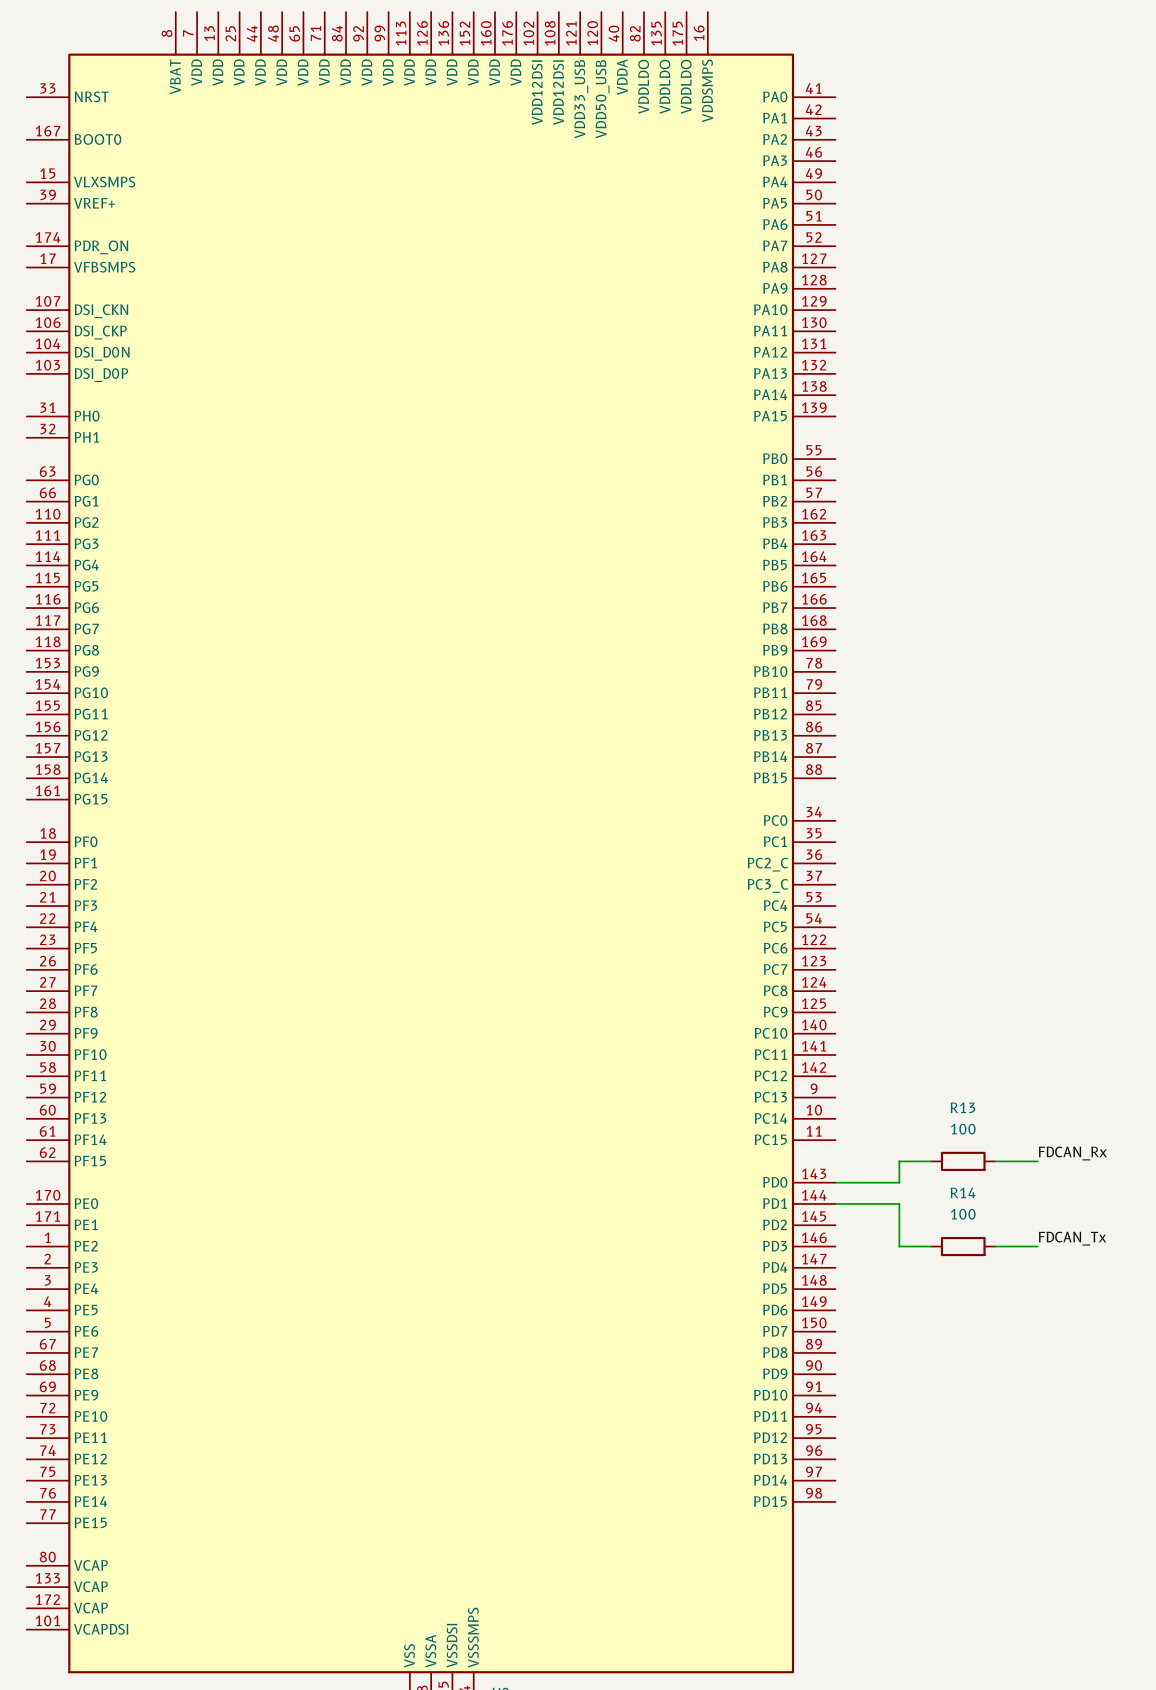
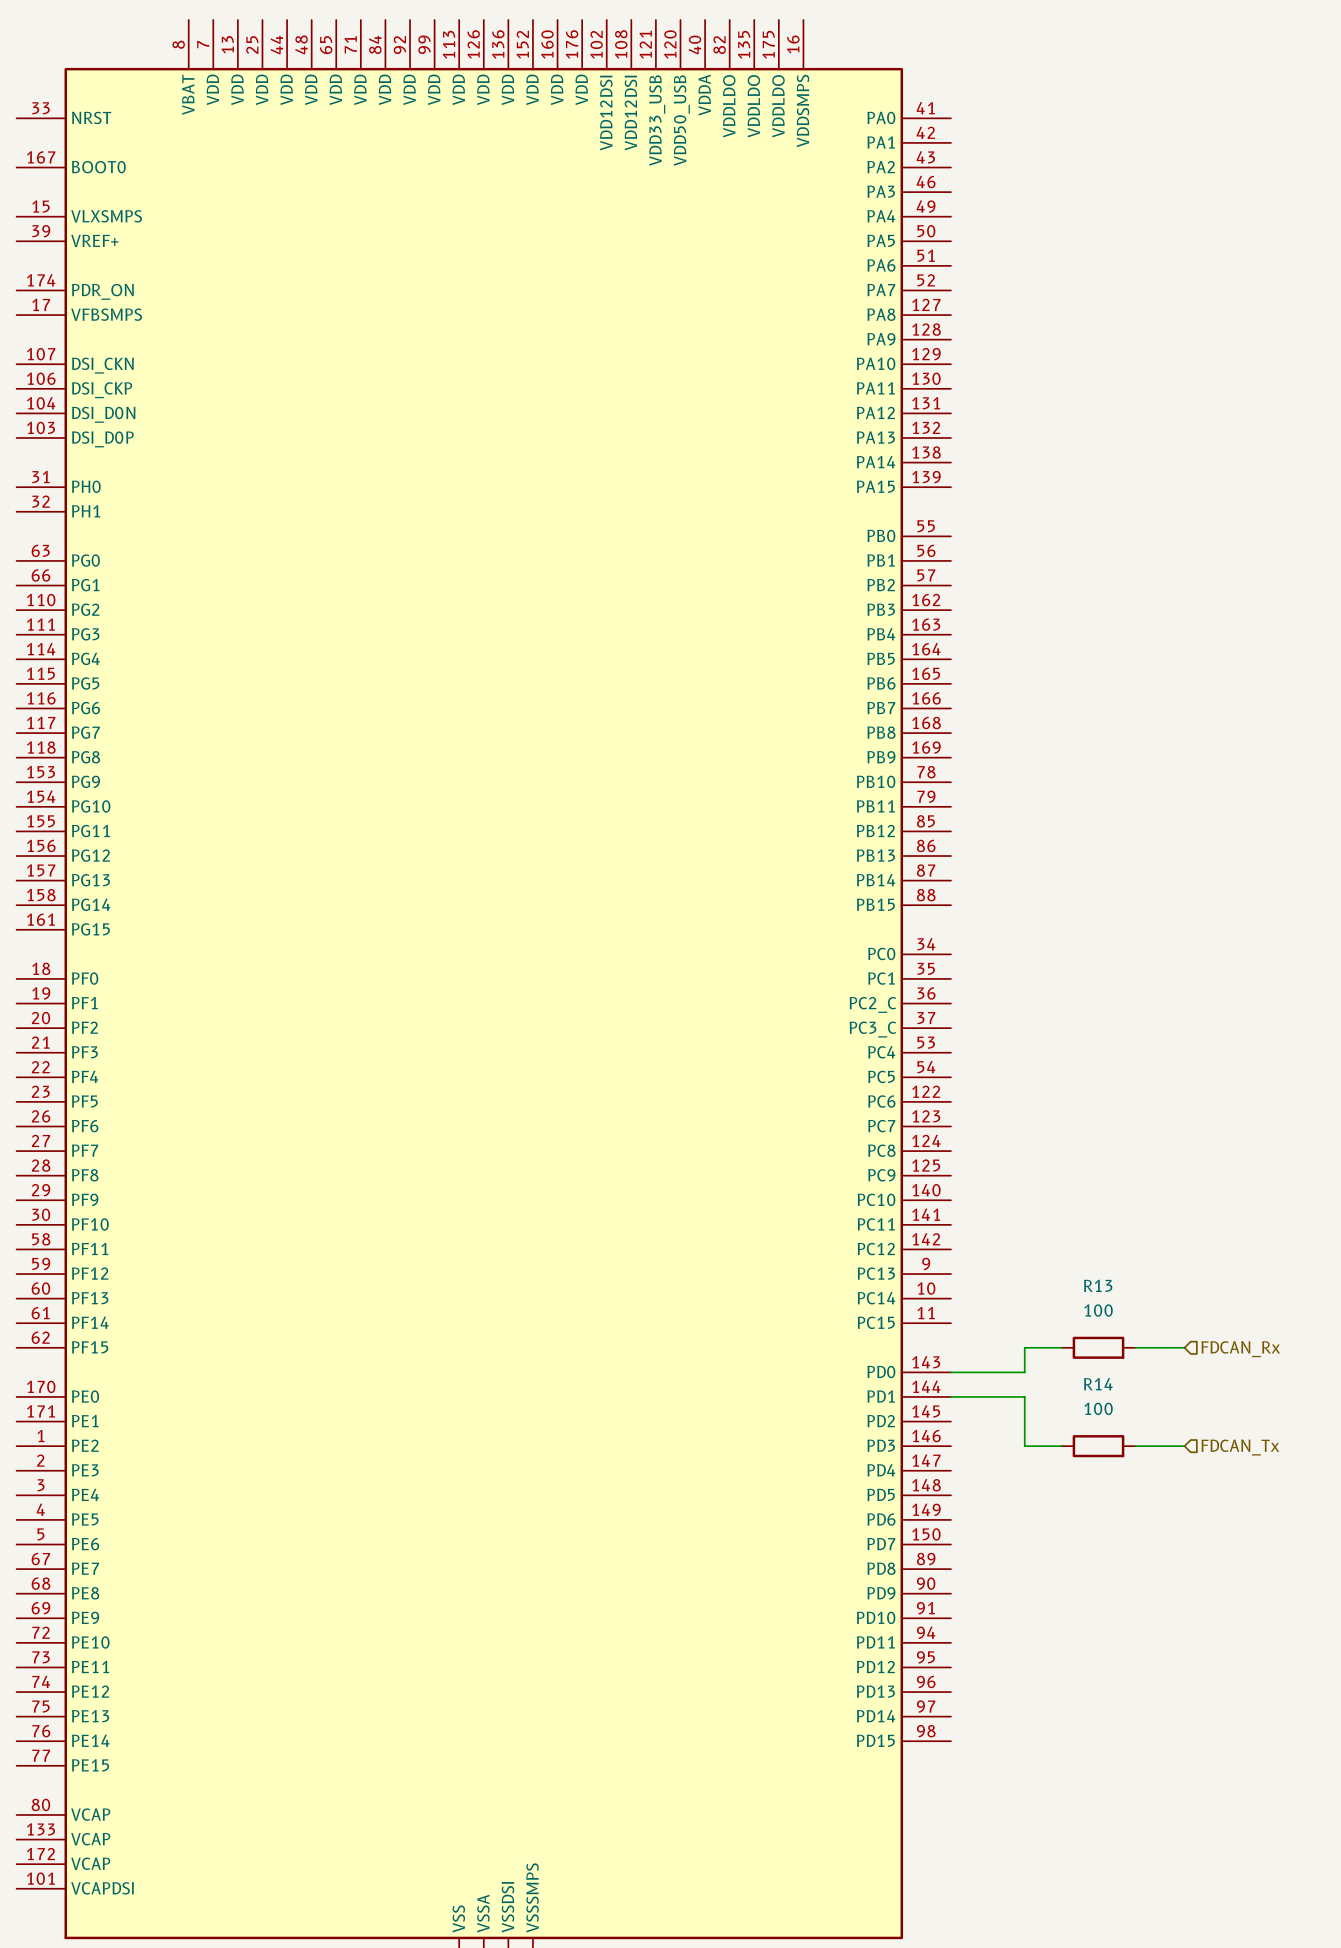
label: FDCAN_Rx (1072, 1153) -> none
hierarchical label: none -> FDCAN_Rx (1240, 1349)
label: FDCAN_Tx (1072, 1238) -> none
hierarchical label: none -> FDCAN_Tx (1240, 1447)

